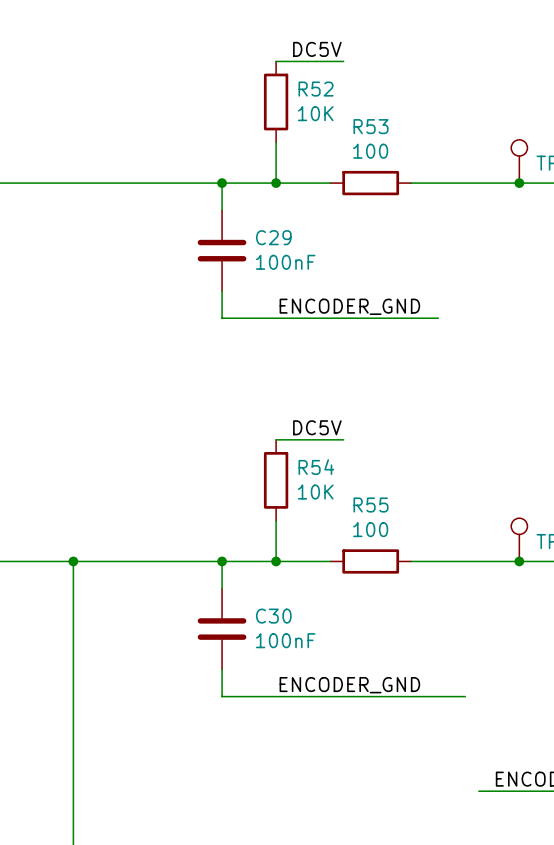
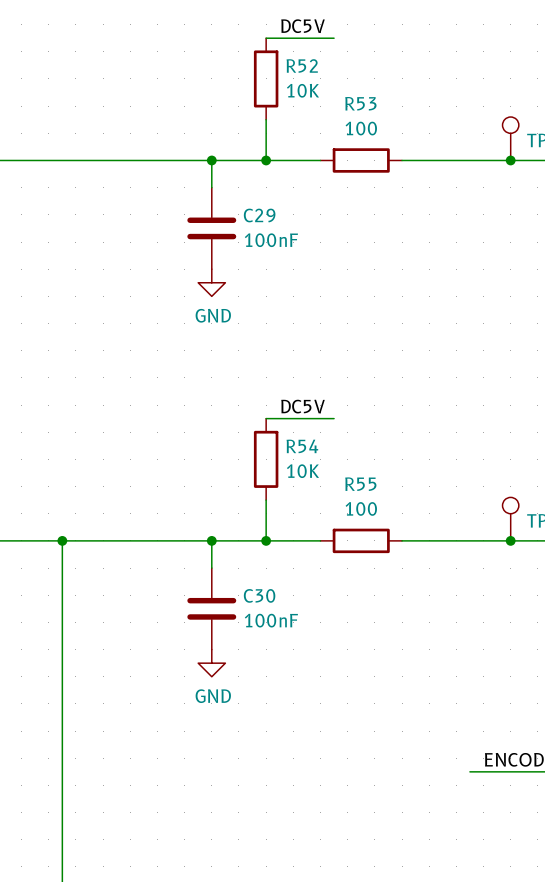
wire: (222, 291) (222, 318) (438, 318) -> none
power symbol: none -> GND (211, 282)
label: ENCODER_GND (349, 306) -> none
wire: (222, 669) (222, 696) (465, 696) -> none
power symbol: none -> GND (211, 663)
label: ENCODER_GND (349, 685) -> none

